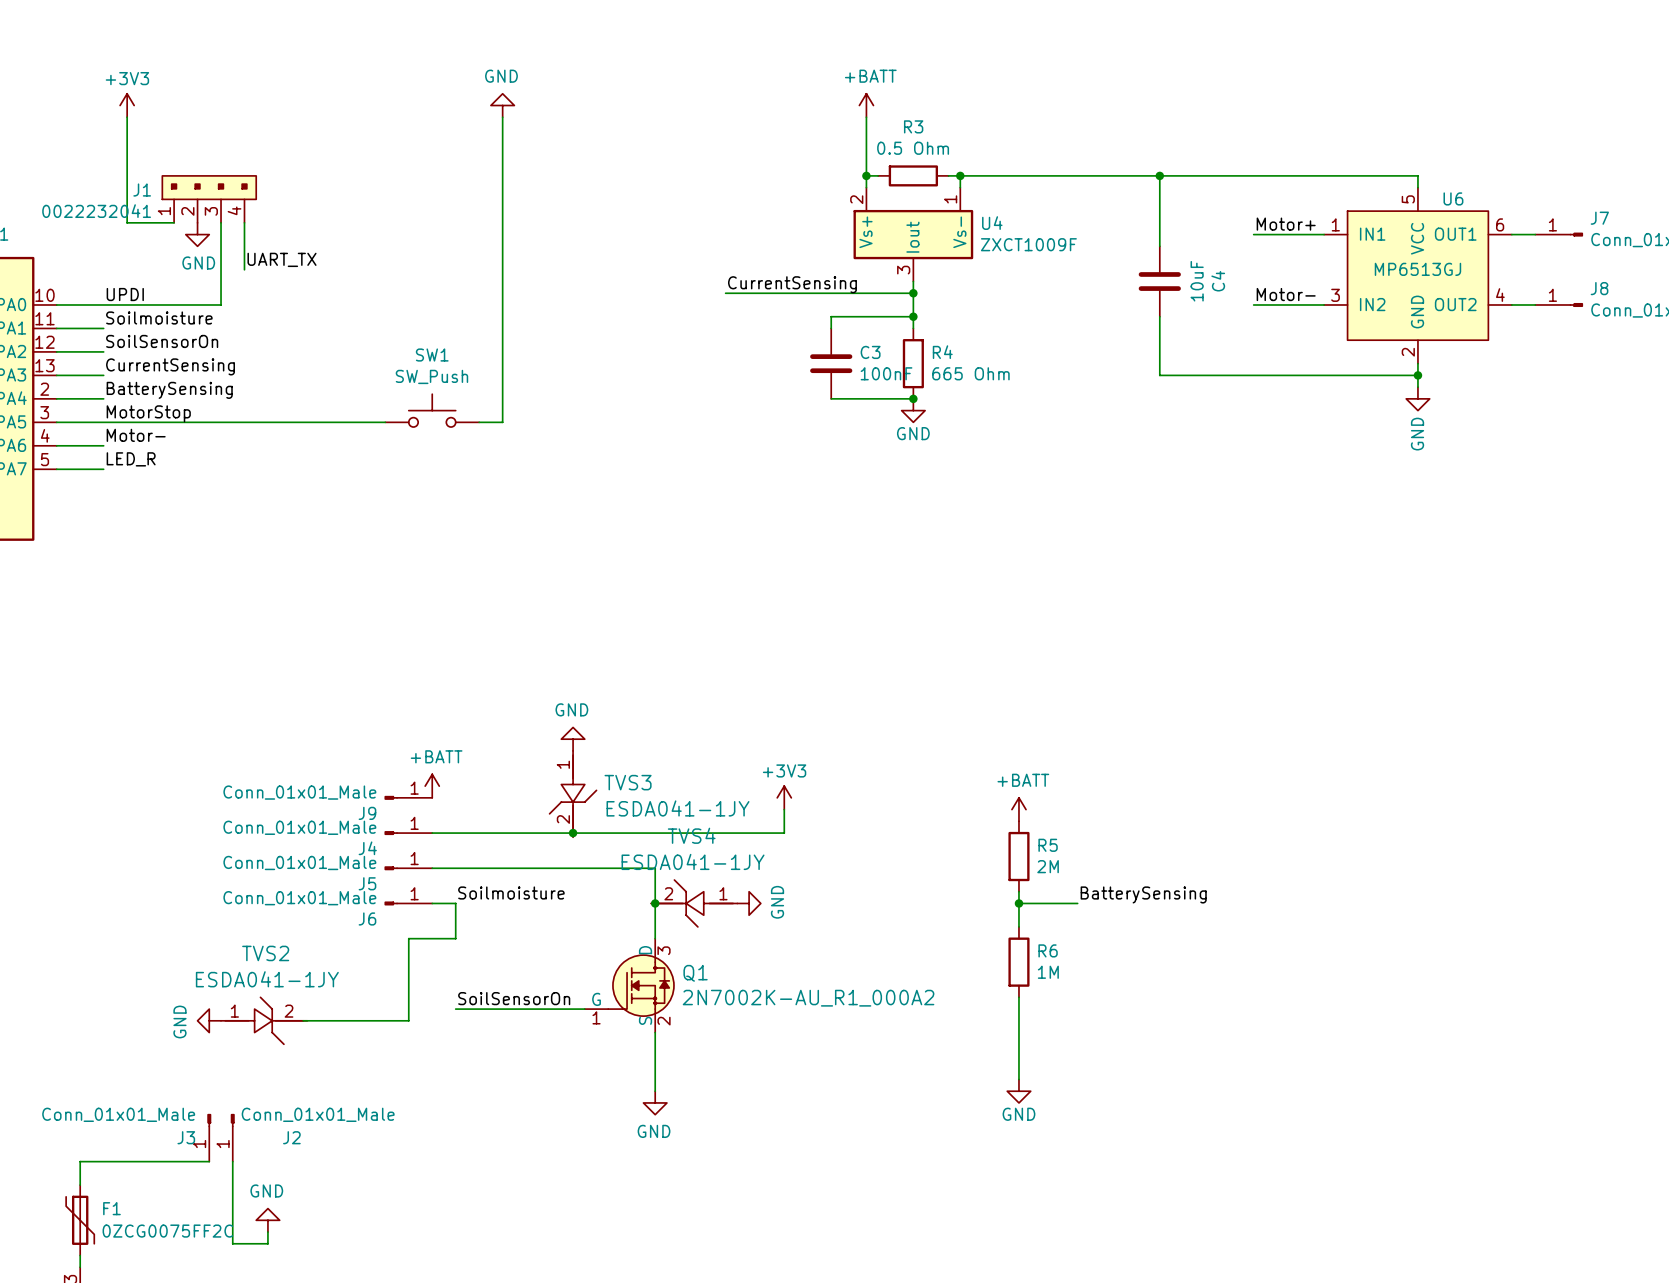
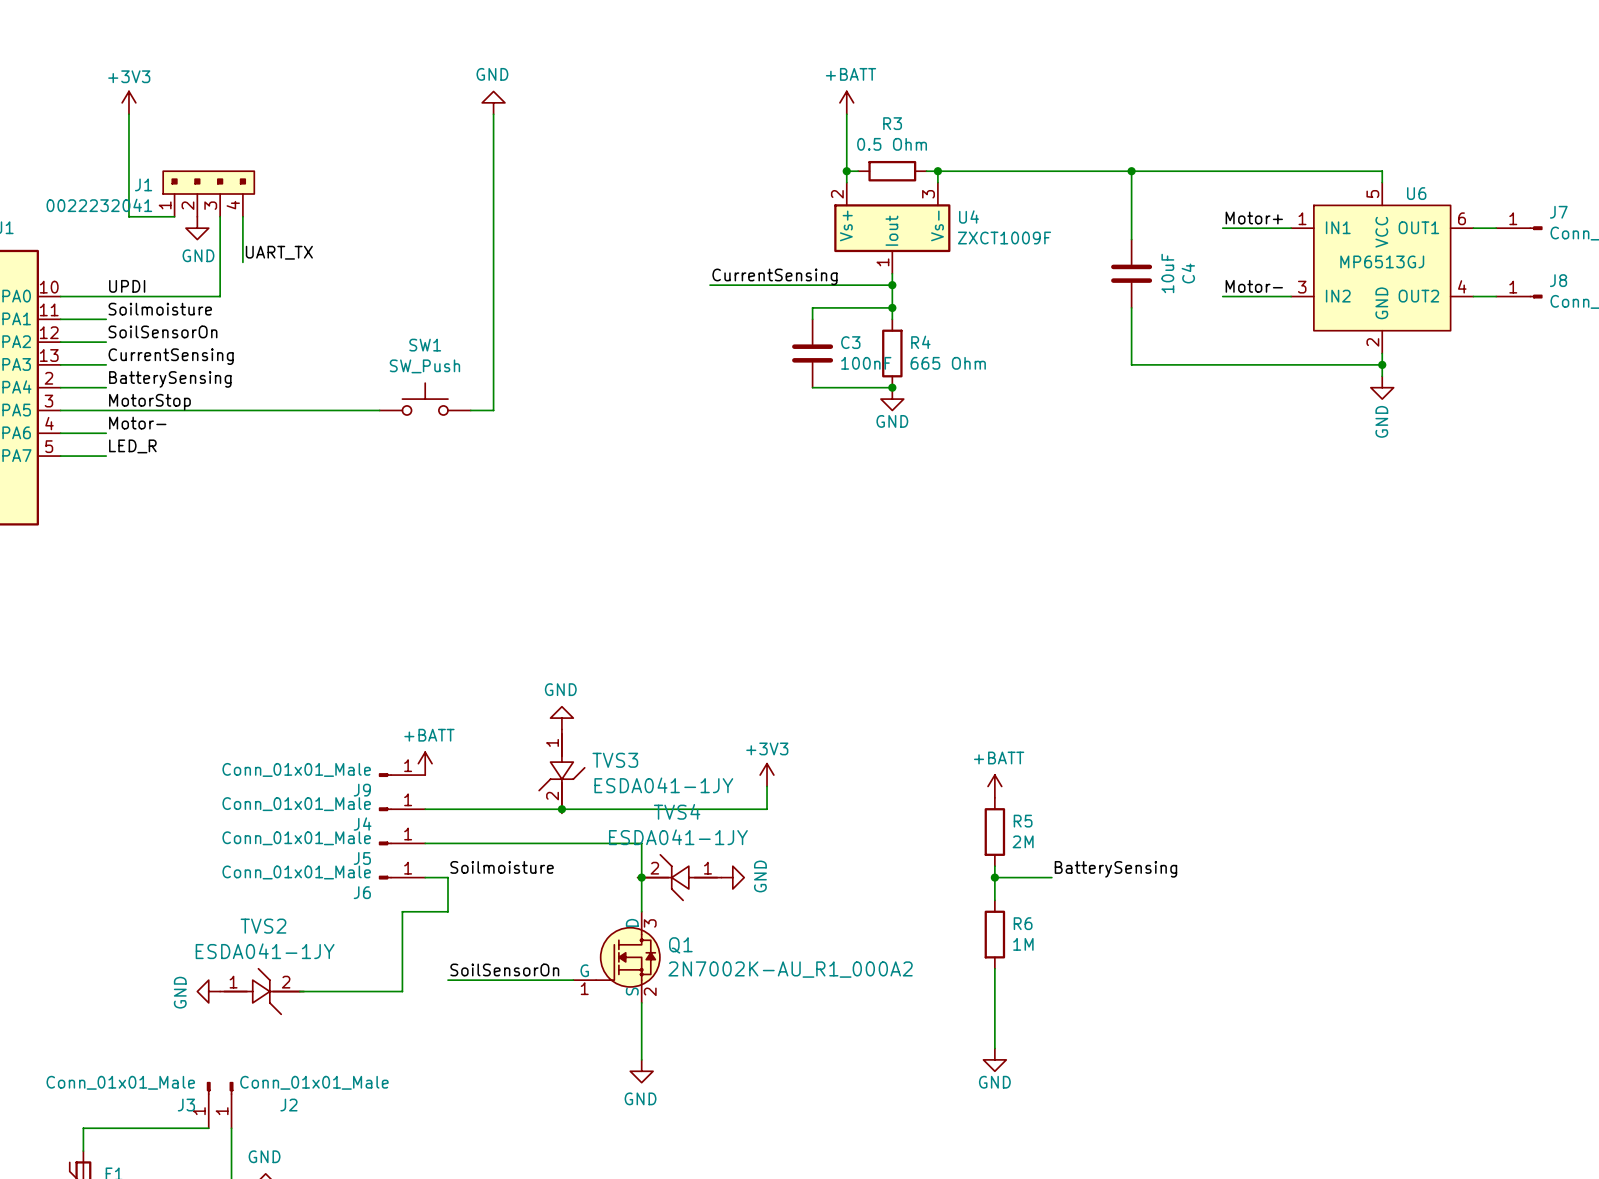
U4 pin number: 1 (950, 199) -> 3 (928, 194)
U4 pin number: 3 (903, 270) -> 1 (882, 262)

